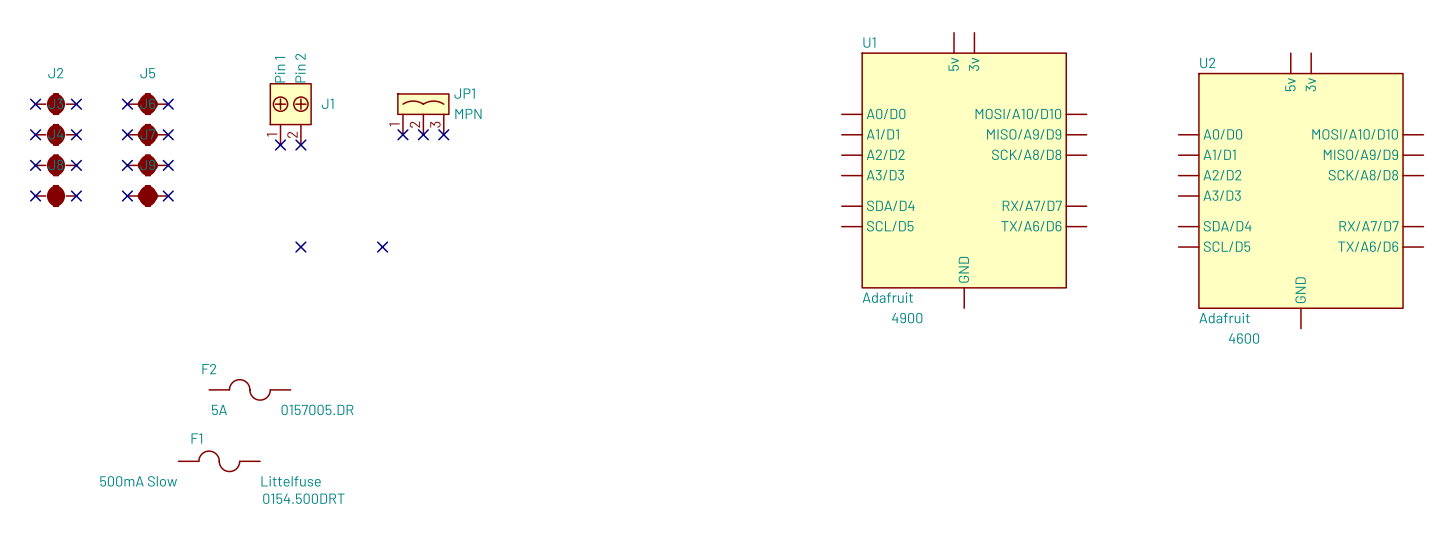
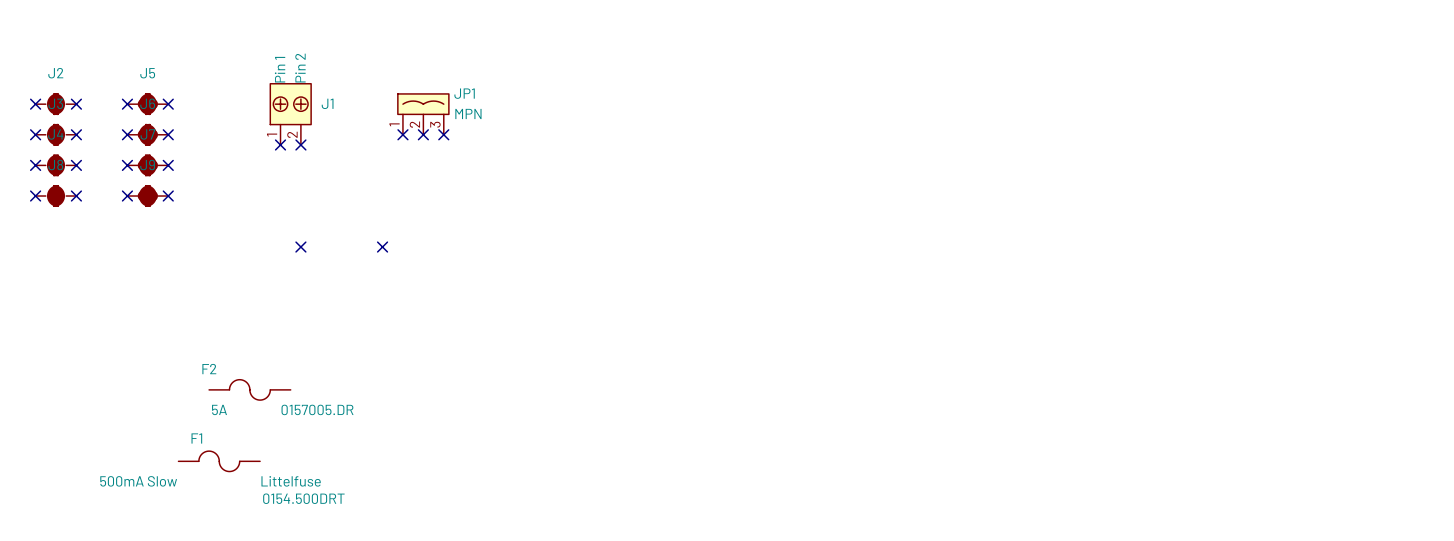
U1: (964, 170) -> none
U2: (1300, 190) -> none

